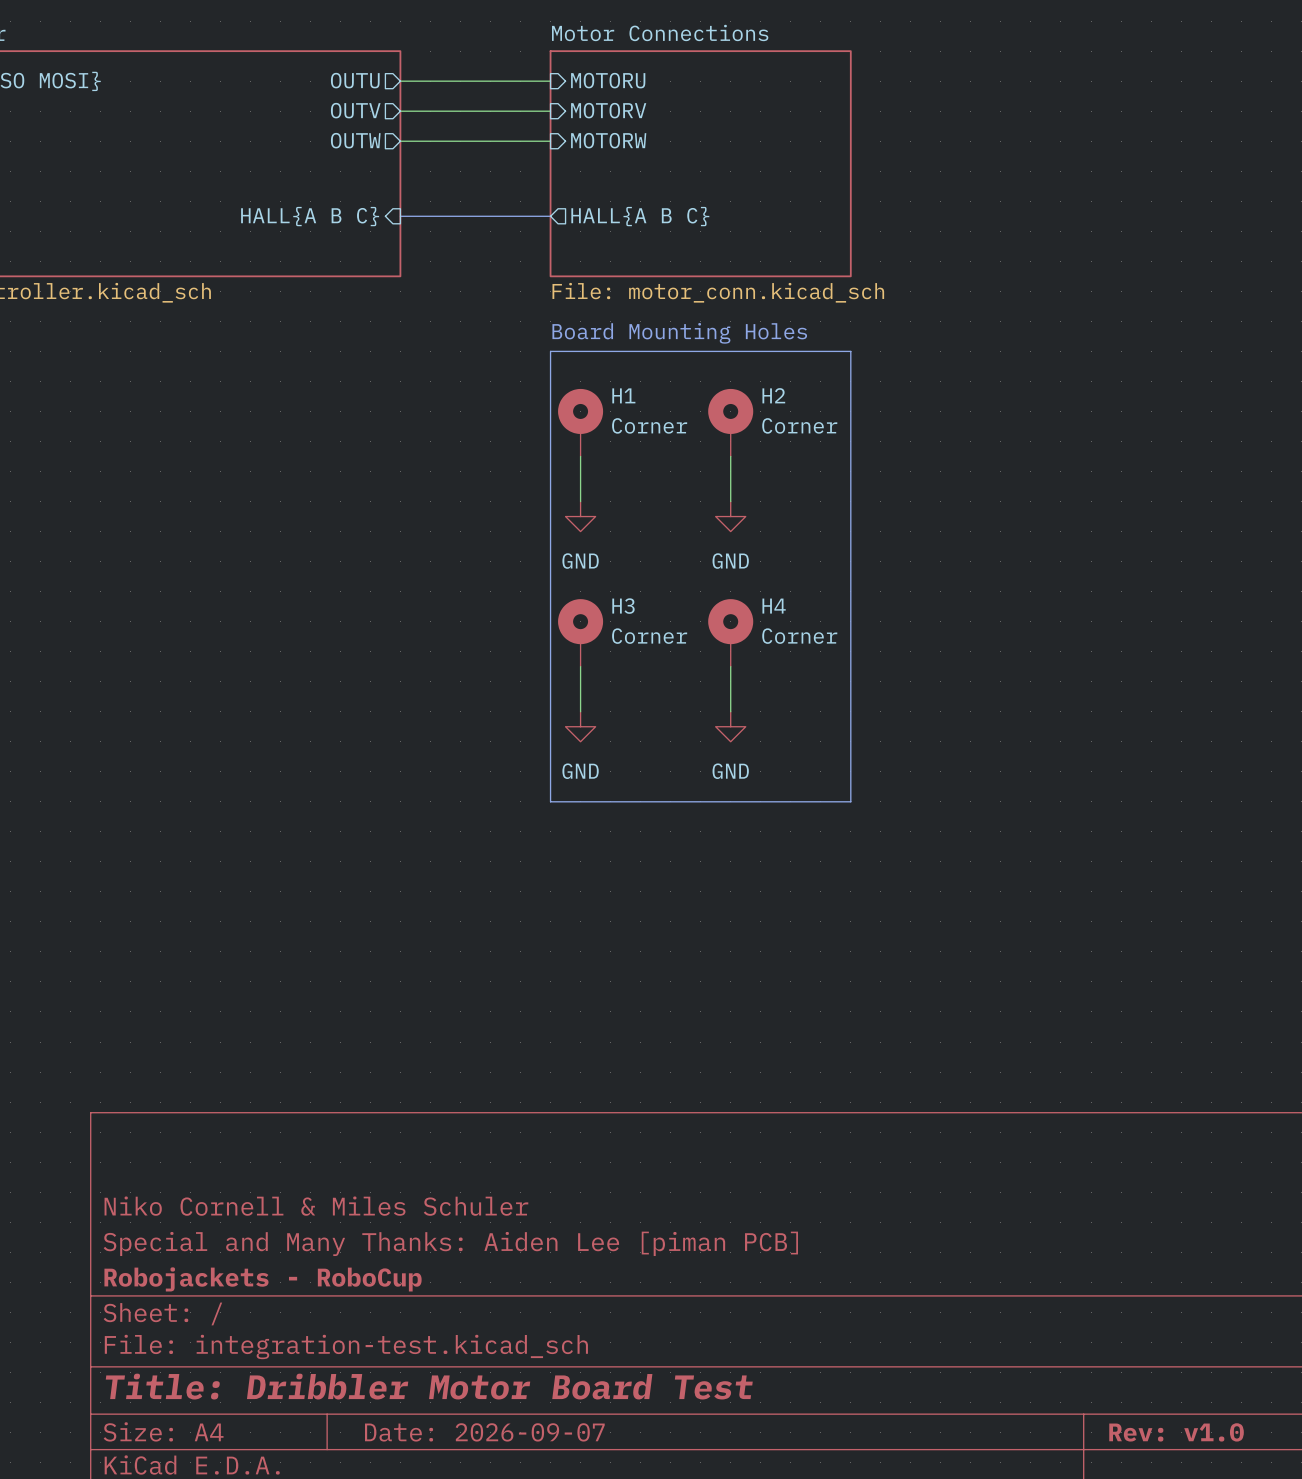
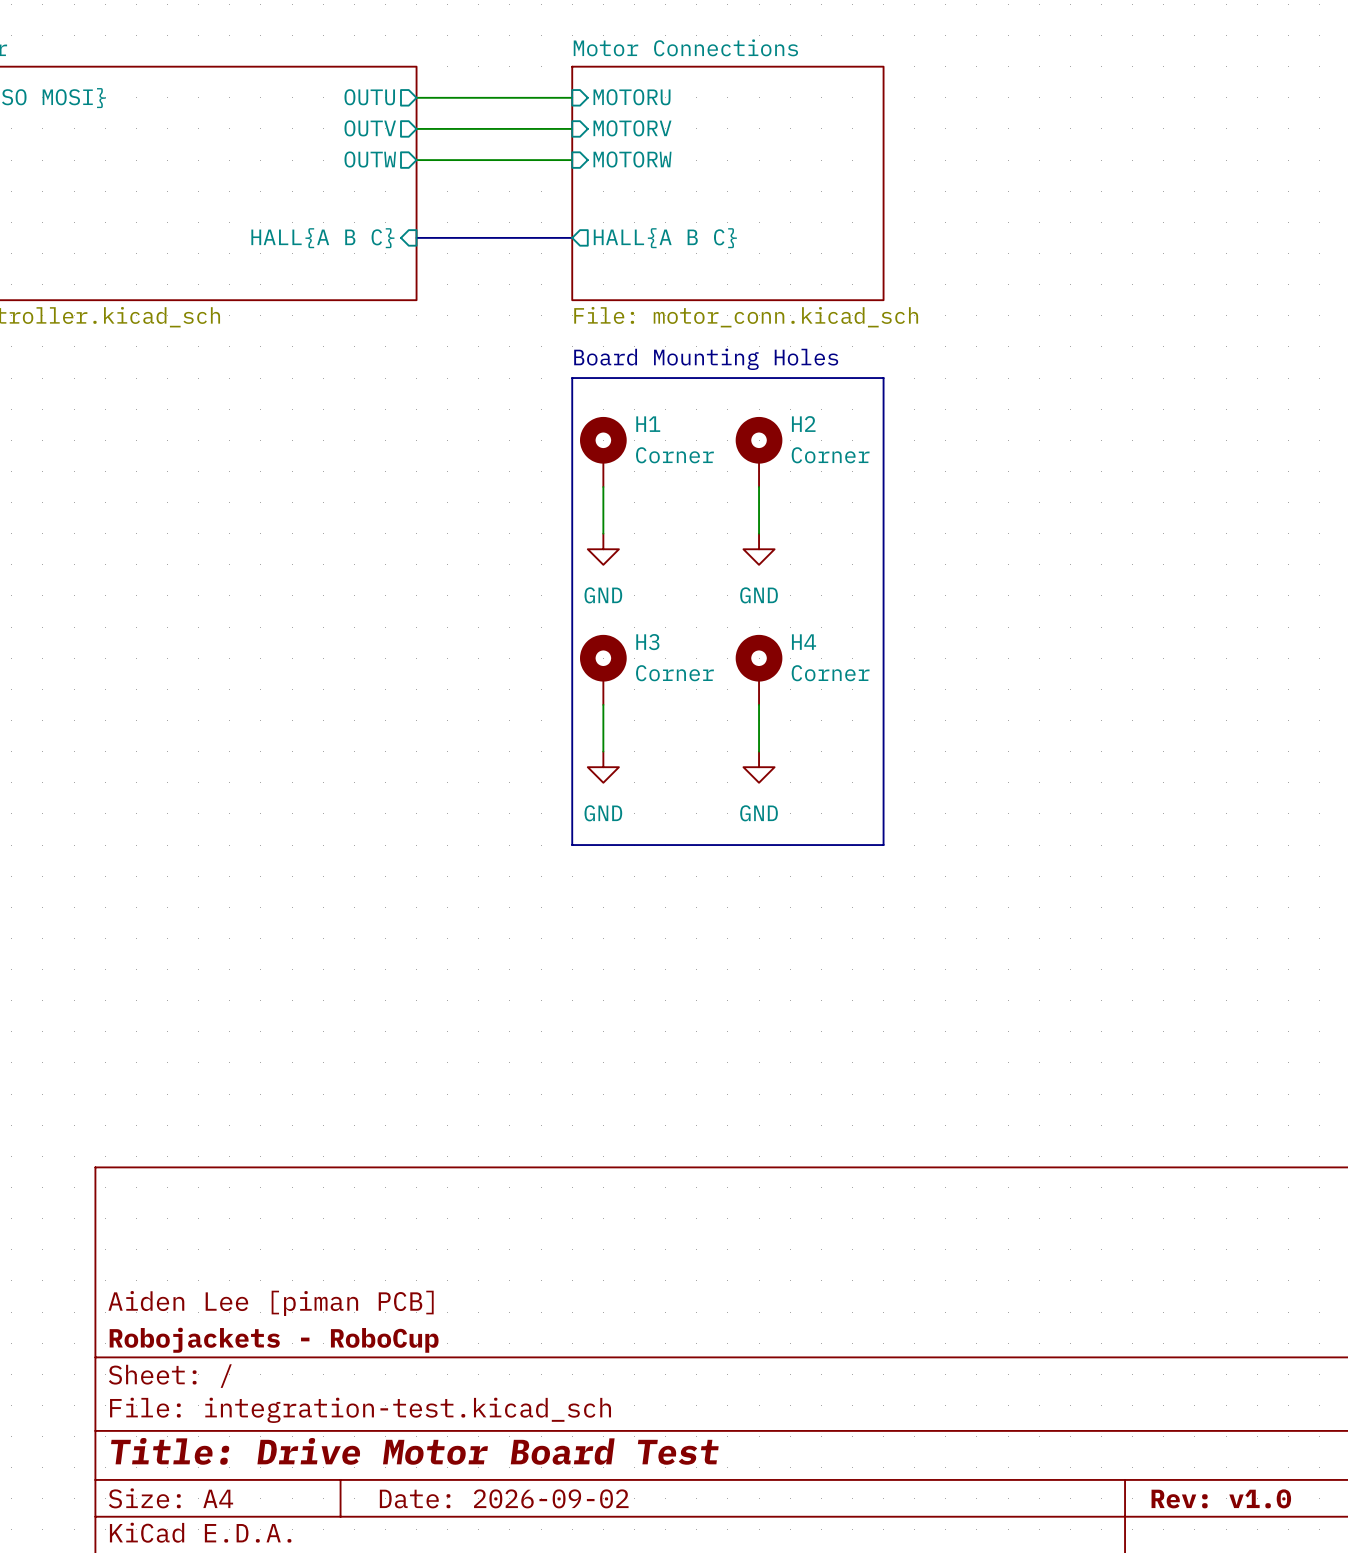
title block: Niko Cornell & Miles Schuler (316, 1206) -> none
title block: Special and Many Thanks: Aiden Lee [piman PCB] (450, 1243) -> Aiden Lee [piman PCB] (271, 1303)
title block: Title: Dribbler Motor Board Test (429, 1386) -> Title: Drive Motor Board Test (414, 1451)
title block: Date: 2026-09-07 (484, 1432) -> Date: 2026-09-02 (504, 1498)

